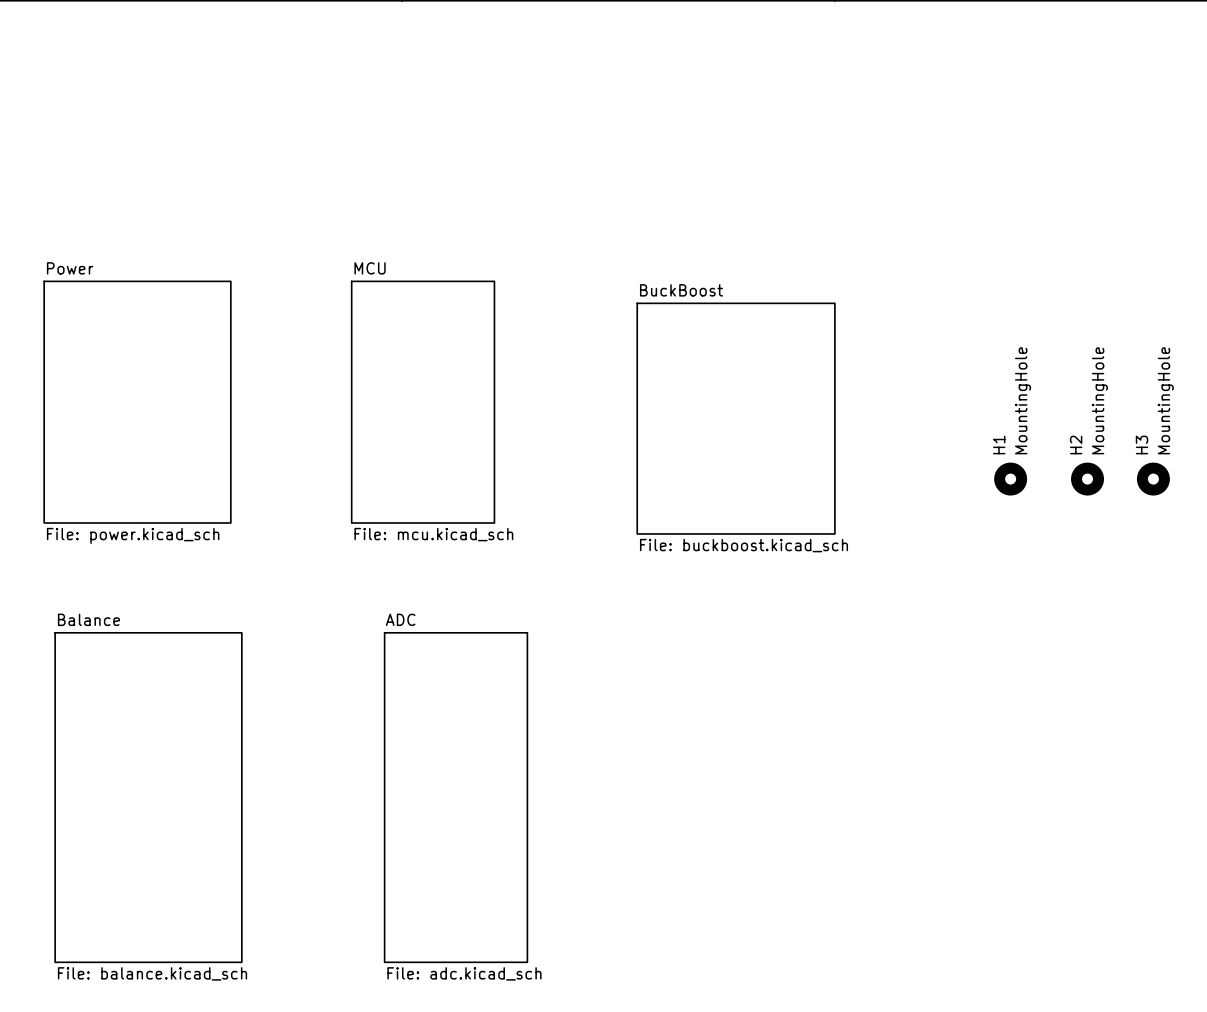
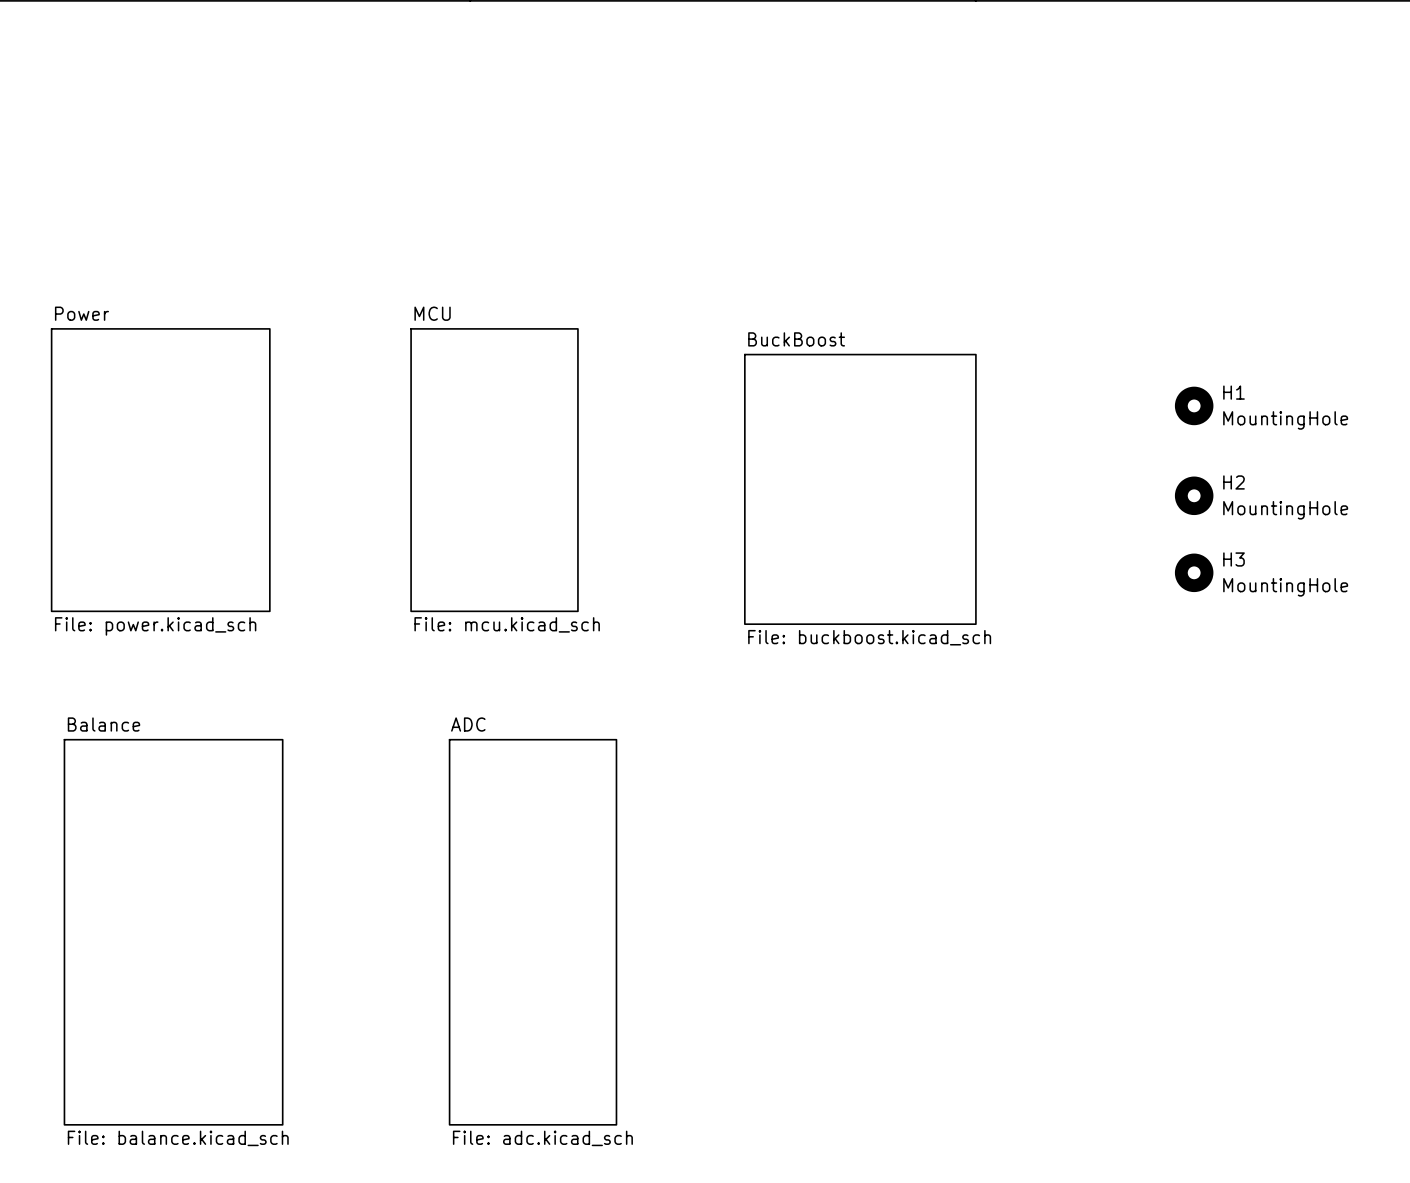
H1 value rotation: 0° (1023, 400) -> 90° clockwise (1285, 420)
H2 value rotation: 0° (1099, 400) -> 90° clockwise (1285, 510)
H3 value rotation: 0° (1165, 400) -> 90° clockwise (1285, 587)
H1 name rotation: 0° (999, 444) -> 90° clockwise (1234, 392)
H1 name position: H1 (999, 444) -> H1 (1234, 392)
H2 name rotation: 0° (1076, 444) -> 90° clockwise (1234, 482)
H2 name position: H2 (1076, 444) -> H2 (1234, 482)
H3 name rotation: 0° (1142, 444) -> 90° clockwise (1234, 559)
H3 name position: H3 (1142, 444) -> H3 (1234, 559)
H1 position: (1010, 479) -> (1194, 405)
H2 position: (1087, 479) -> (1194, 495)
H3 position: (1153, 479) -> (1194, 572)

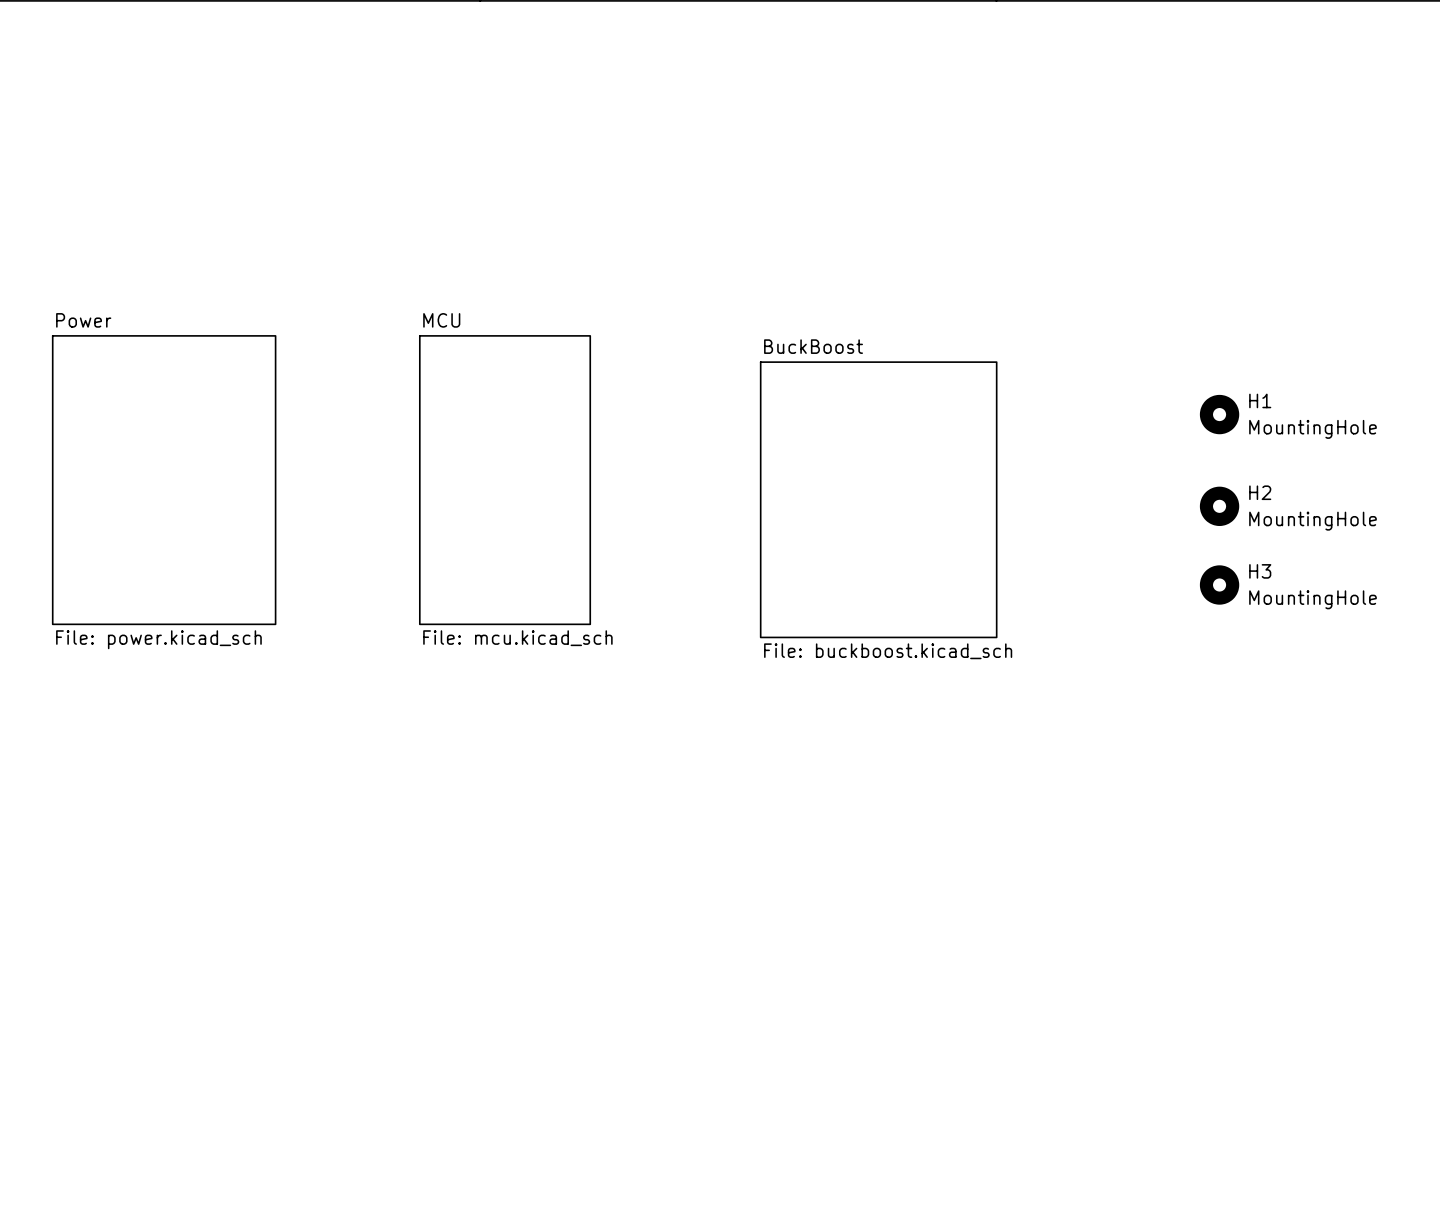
sheet Balance: File: balance.kicad_sch (173, 932) -> none
sheet ADC: File: adc.kicad_sch (533, 932) -> none

